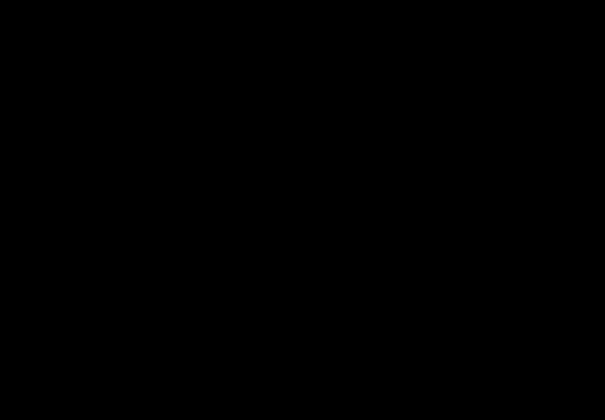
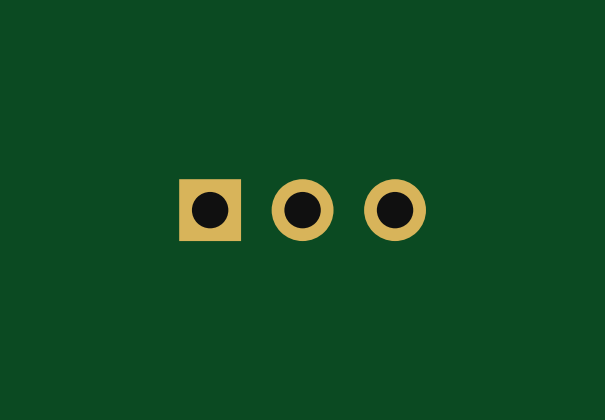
part: none -> (302, 210)

